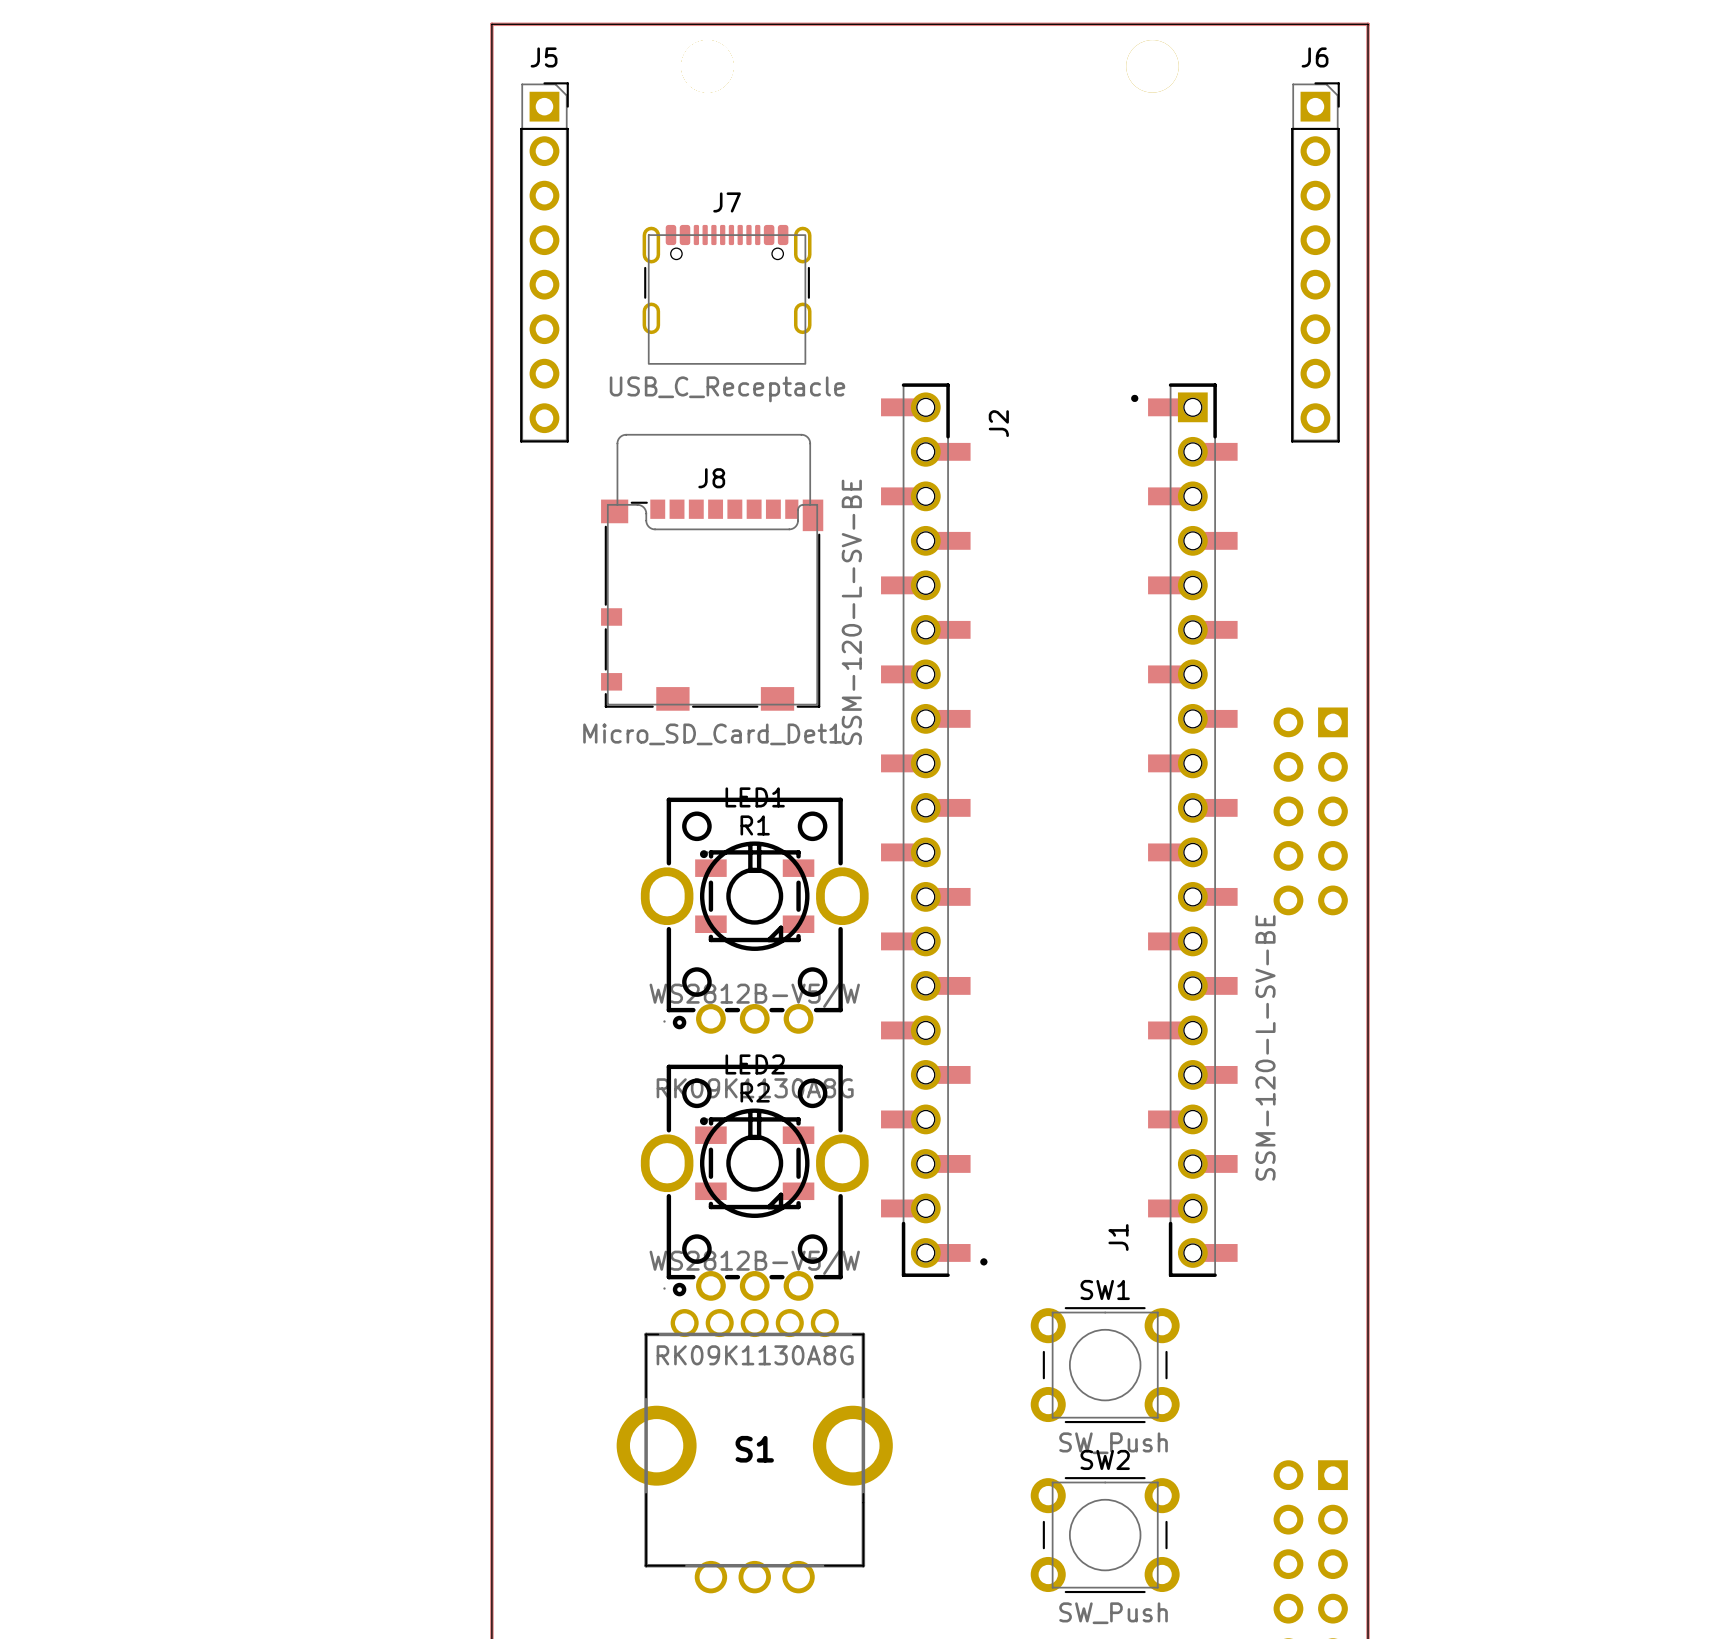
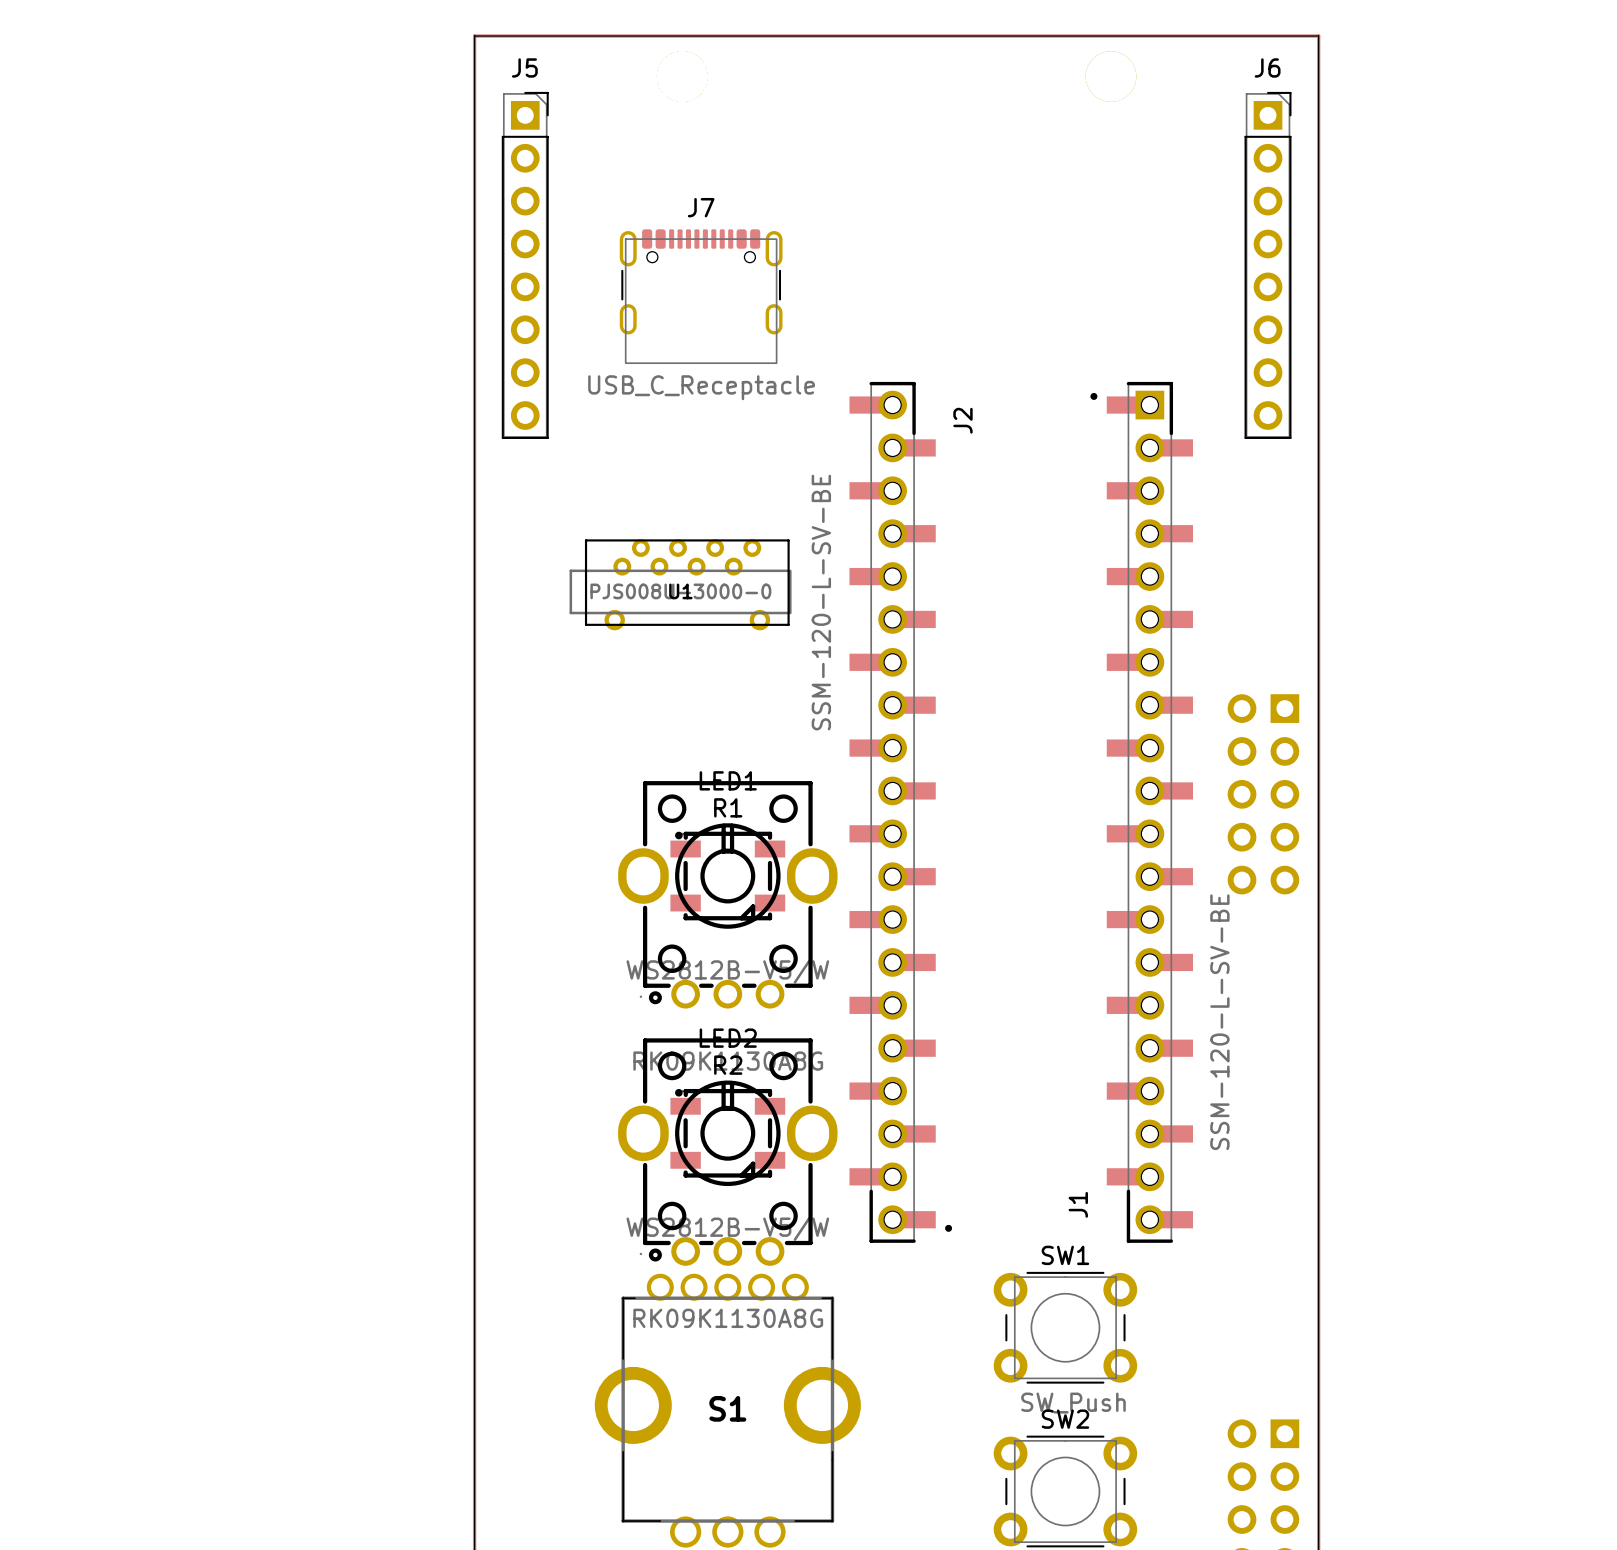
J8: Micro_SD_Card_Det1 (712, 572) -> none
U1: none -> PJS008U-3000-0 (680, 584)

